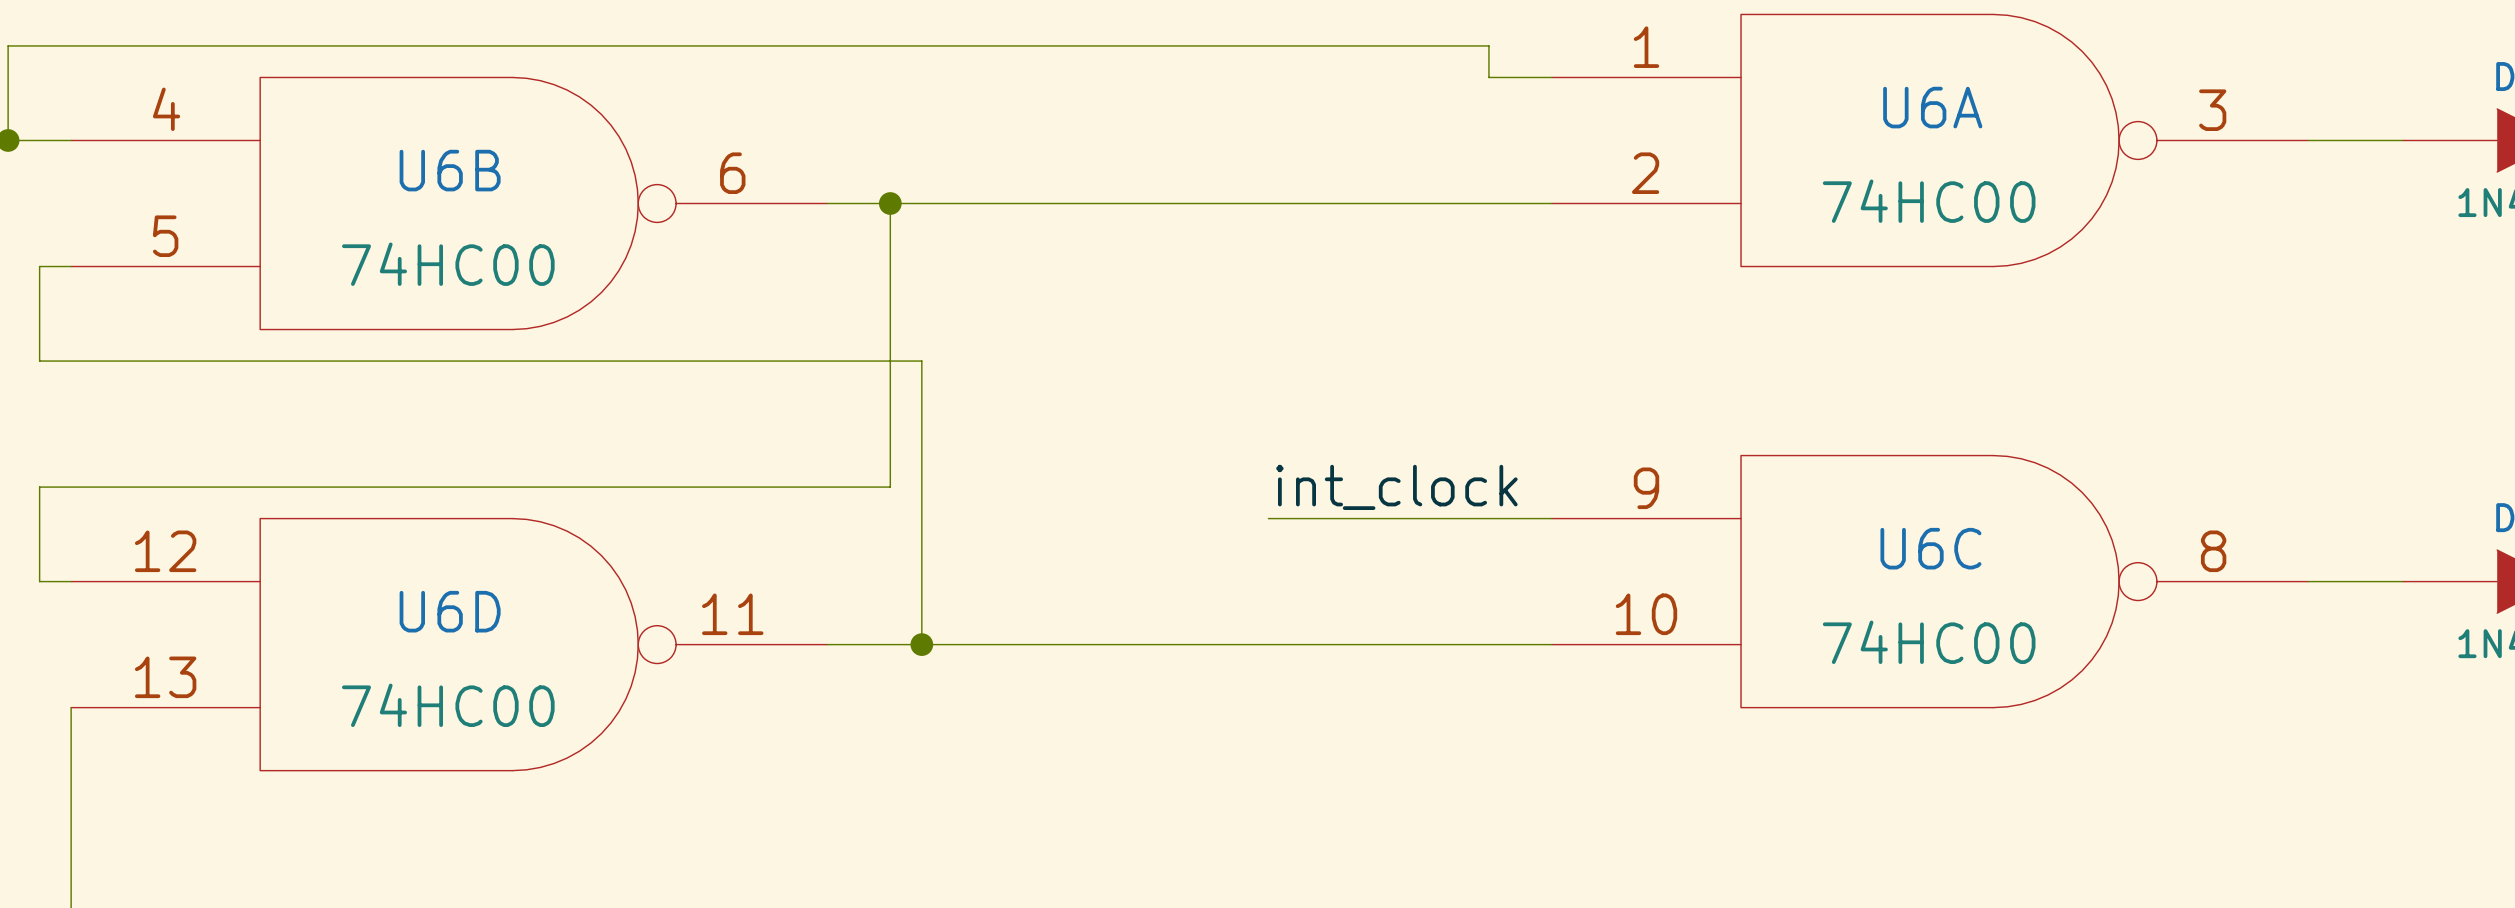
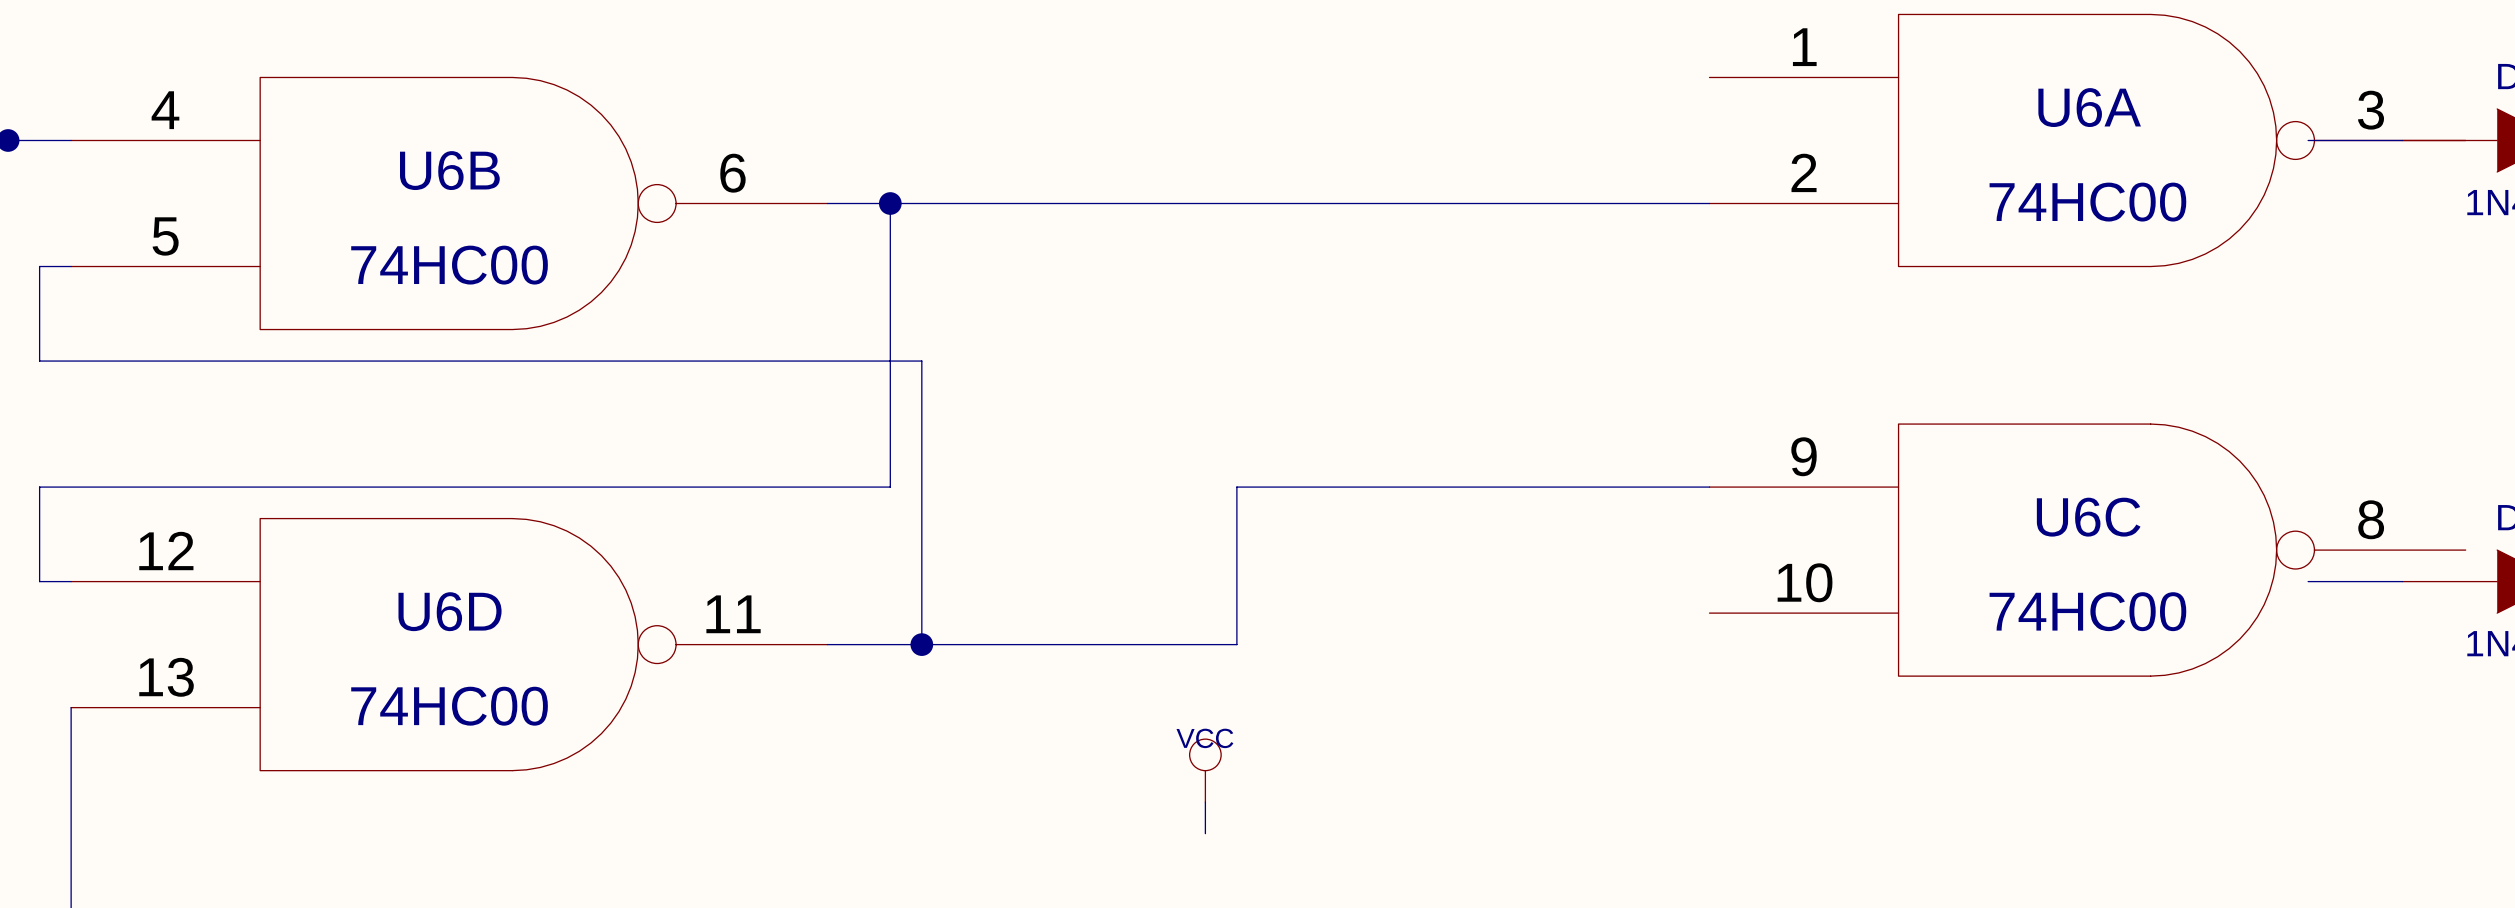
wire: (1551, 77) (1488, 77) (1488, 45) (8, 45) (8, 140) -> none
U6A position: (1930, 140) -> (2087, 140)
label: int_clock (1396, 487) -> none
wire: (1268, 518) (1551, 518) -> none
U6C position: (1930, 581) -> (2087, 550)
wire: (1236, 644) (1551, 644) -> (1236, 644) (1236, 487) (1709, 487)
power symbol: none -> VCC (1205, 770)
wire: none -> (1205, 802) (1205, 833)

